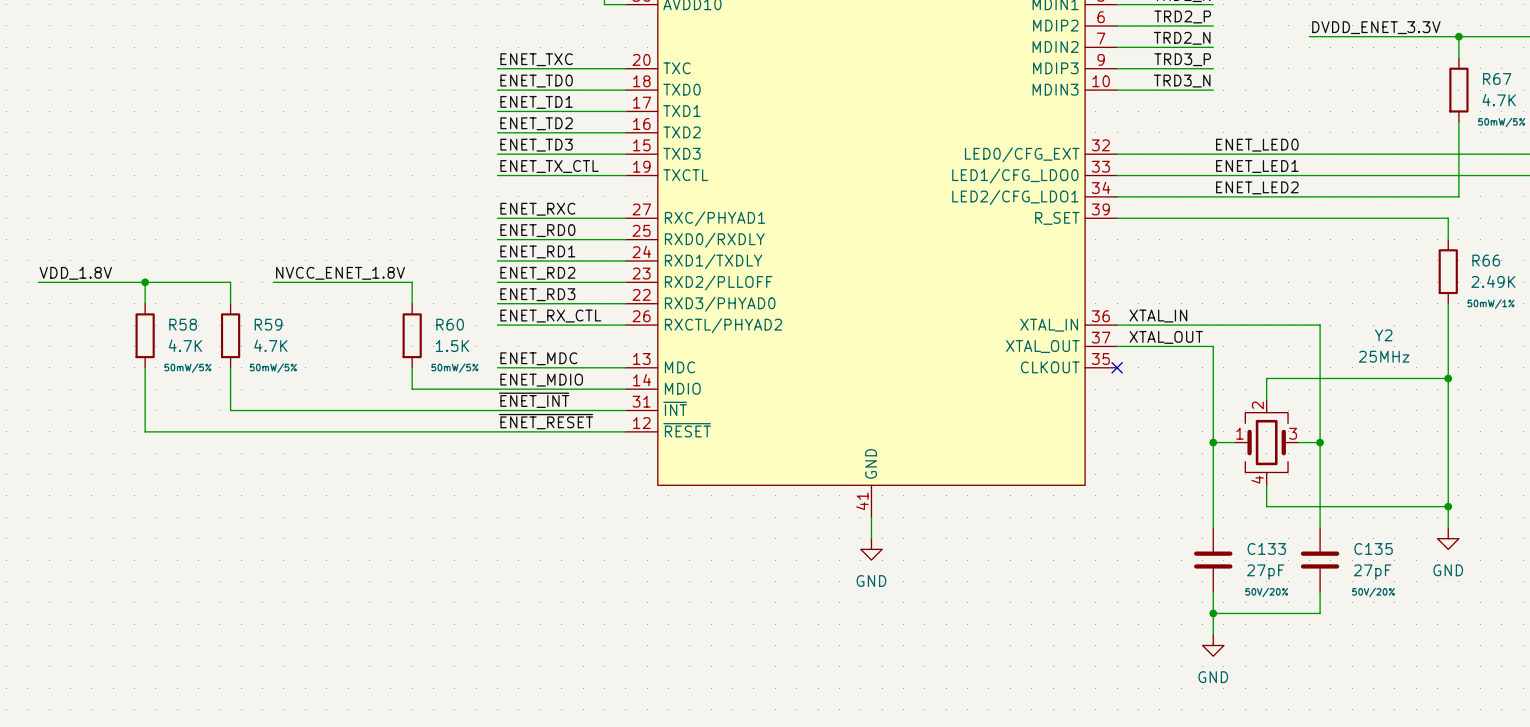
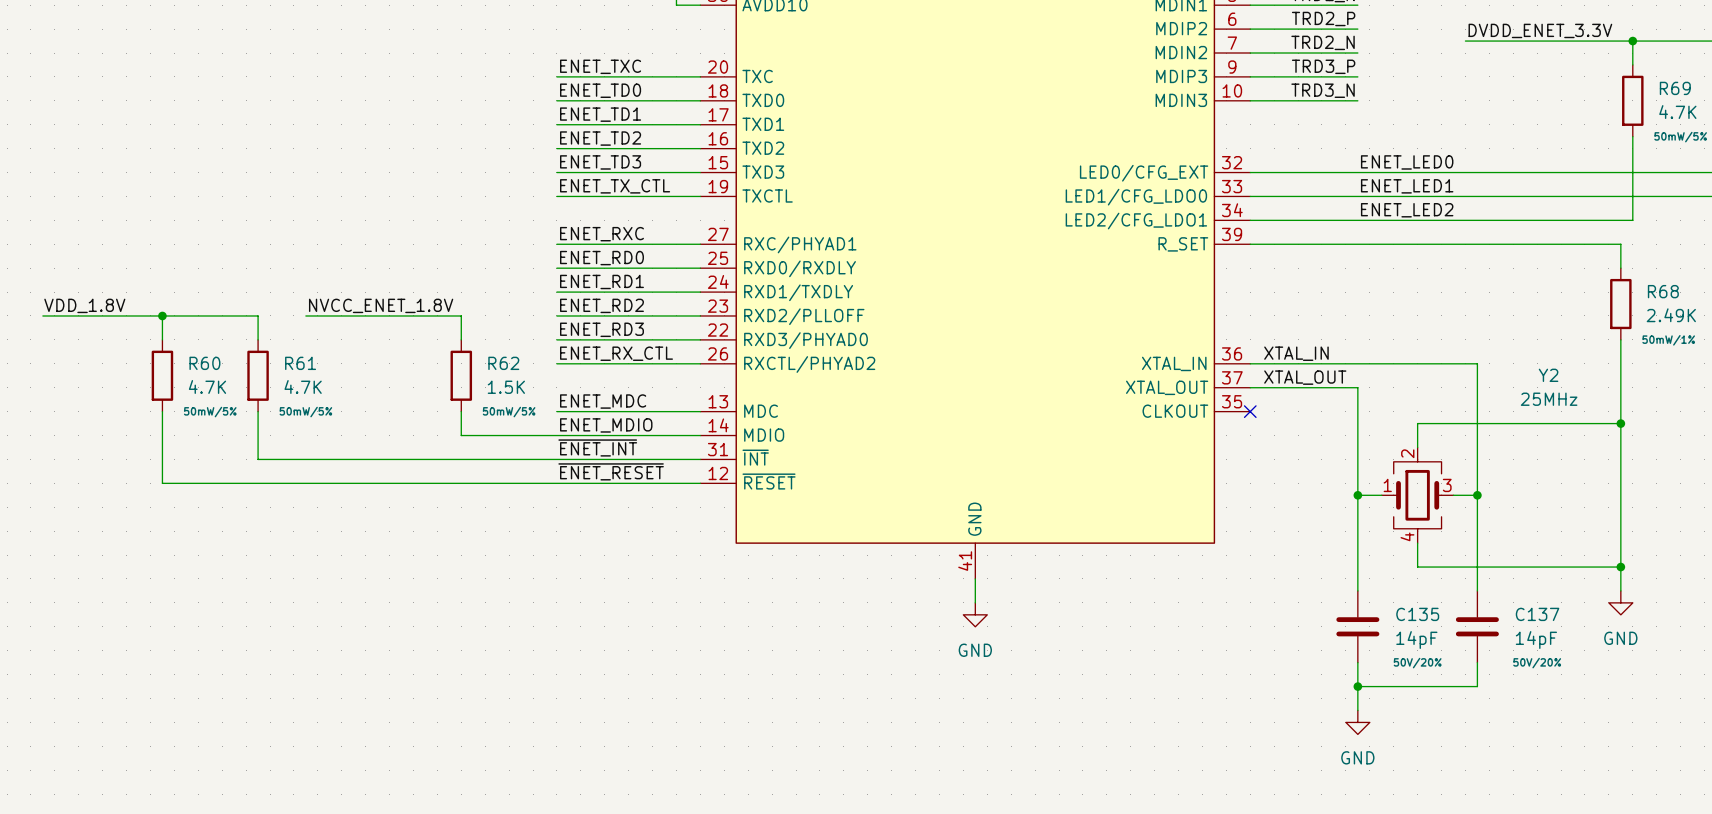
R67 name: R67 (1497, 79) -> R69 (1675, 88)
R66 name: R66 (1486, 260) -> R68 (1663, 291)
R58 name: R58 (183, 324) -> R60 (204, 363)
R59 name: R59 (268, 324) -> R61 (300, 363)
R60 name: R60 (450, 324) -> R62 (503, 363)
C133 name: C133 (1266, 548) -> C135 (1417, 614)
C135 name: C135 (1373, 548) -> C137 (1537, 614)
C133 value: 27pF (1265, 572) -> 14pF (1416, 640)
C135 value: 27pF (1372, 572) -> 14pF (1536, 640)

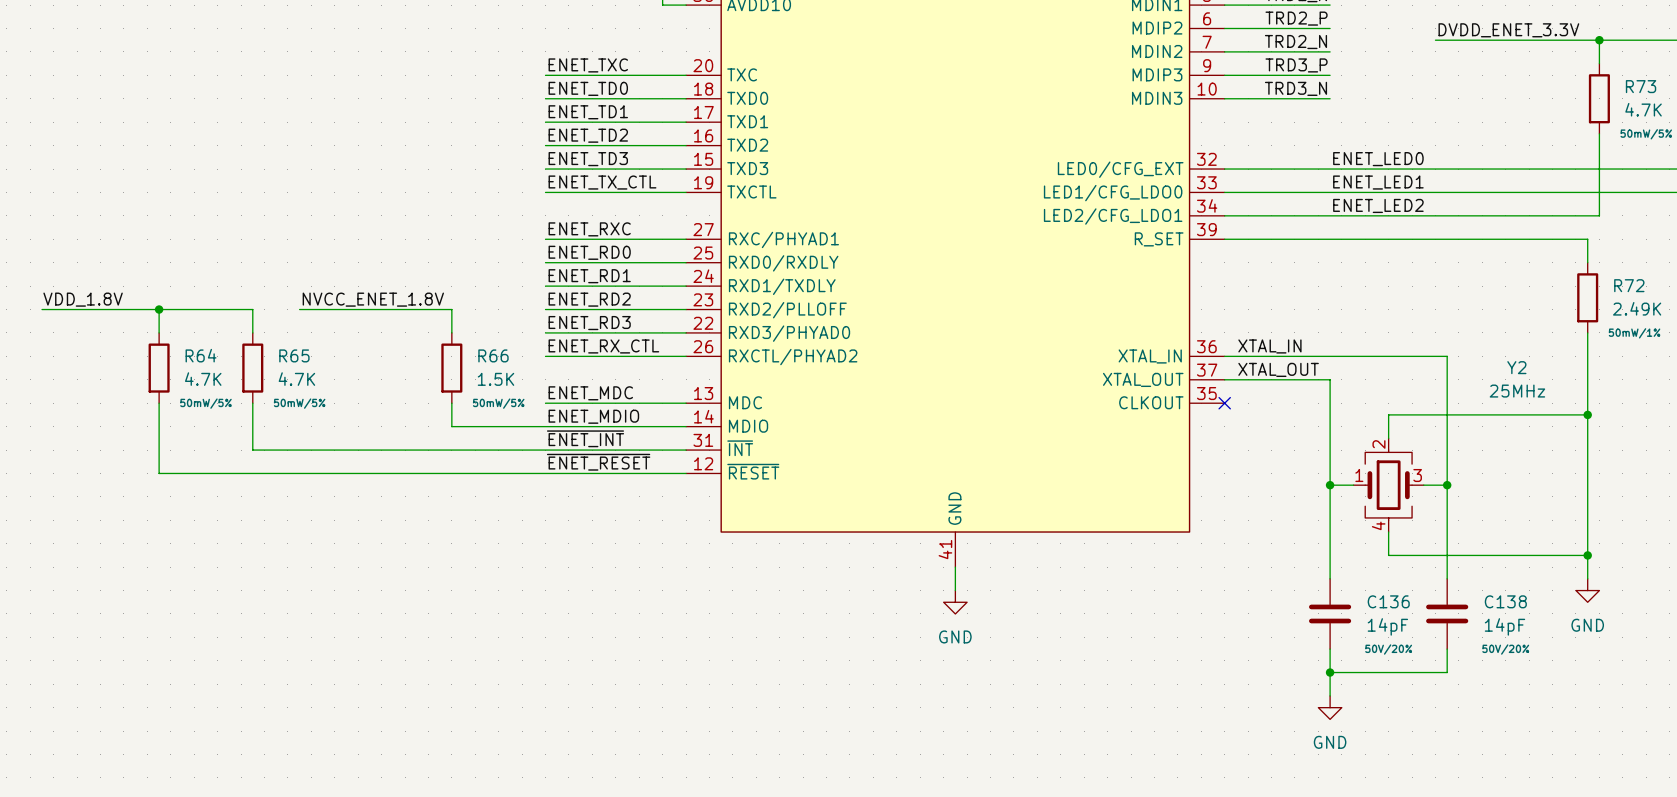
R69 name: R69 (1675, 88) -> R73 (1641, 86)
R68 name: R68 (1663, 291) -> R72 (1629, 285)
R60 name: R60 (204, 363) -> R64 (201, 355)
R61 name: R61 (300, 363) -> R65 (294, 355)
R62 name: R62 (503, 363) -> R66 (493, 355)
C135 name: C135 (1417, 614) -> C136 (1388, 601)
C137 name: C137 (1537, 614) -> C138 (1505, 601)

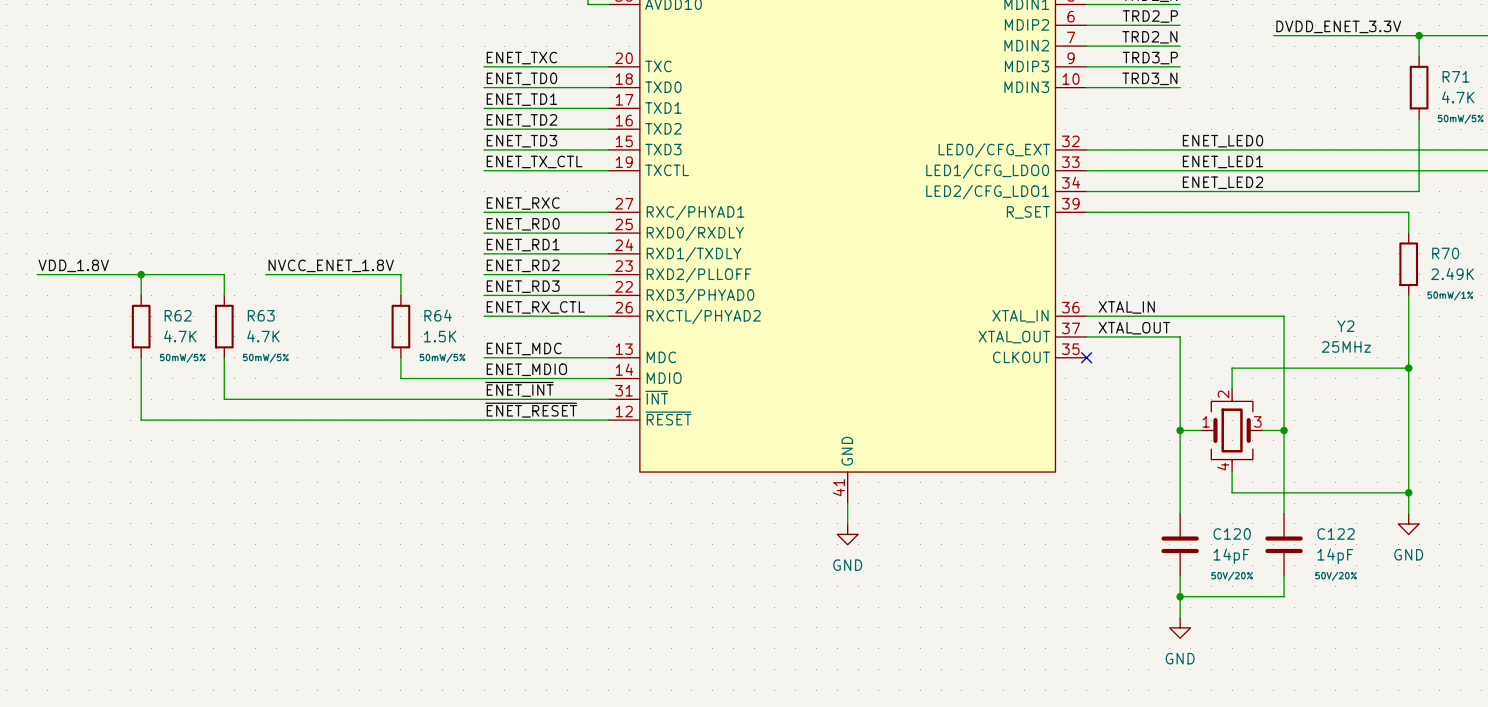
R73 name: R73 (1641, 86) -> R71 (1456, 76)
R72 name: R72 (1629, 285) -> R70 (1445, 253)
R64 name: R64 (201, 355) -> R62 (178, 315)
R65 name: R65 (294, 355) -> R63 (261, 315)
R66 name: R66 (493, 355) -> R64 (438, 315)
C136 name: C136 (1388, 601) -> C120 (1232, 533)
C138 name: C138 (1505, 601) -> C122 (1336, 533)

